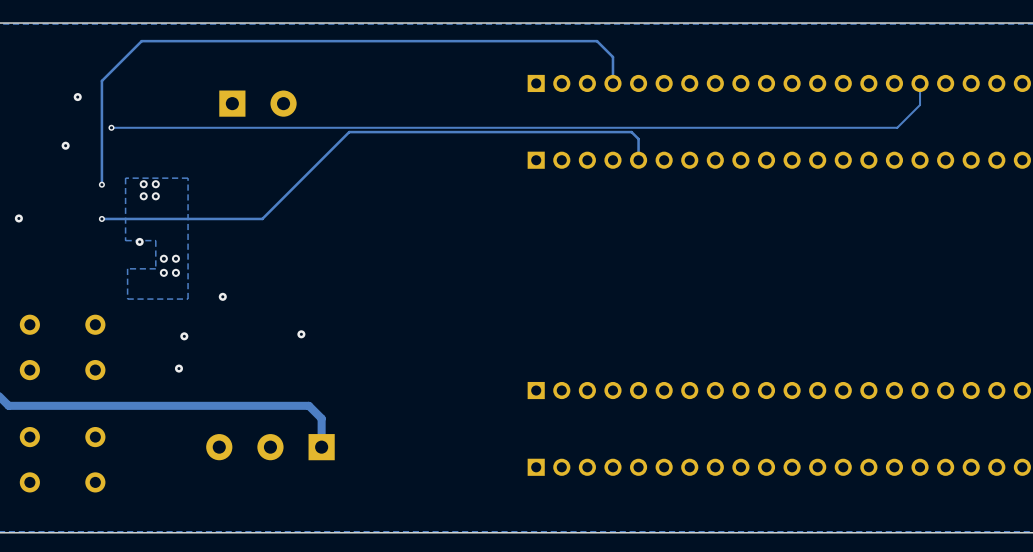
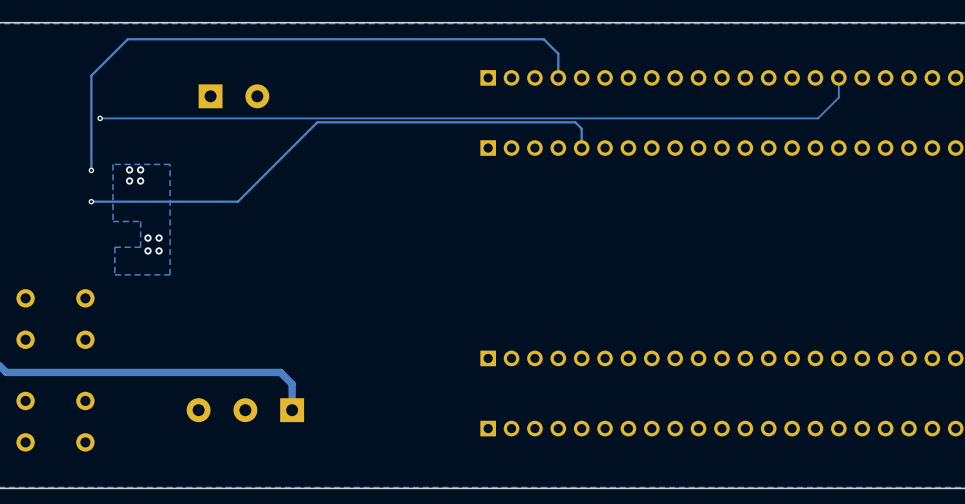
via: (77, 97) -> none
via: (65, 145) -> none
via: (18, 218) -> none
via: (139, 241) -> none
via: (222, 296) -> none
via: (301, 334) -> none
via: (184, 336) -> none
via: (178, 368) -> none

